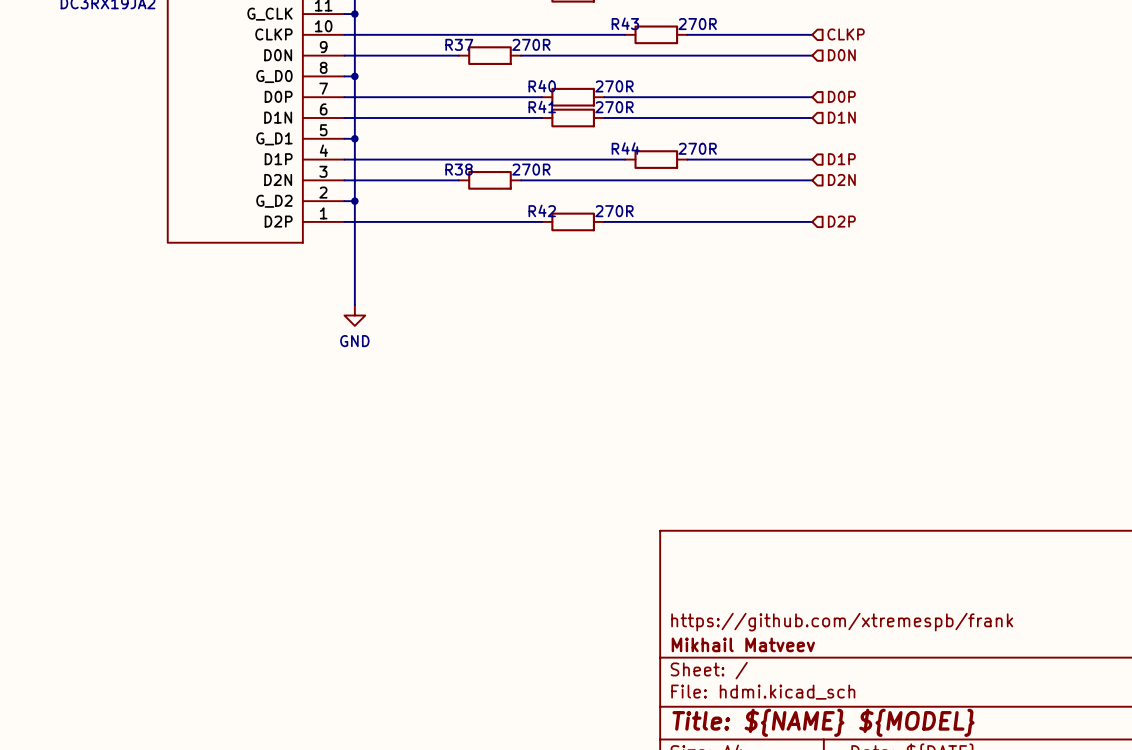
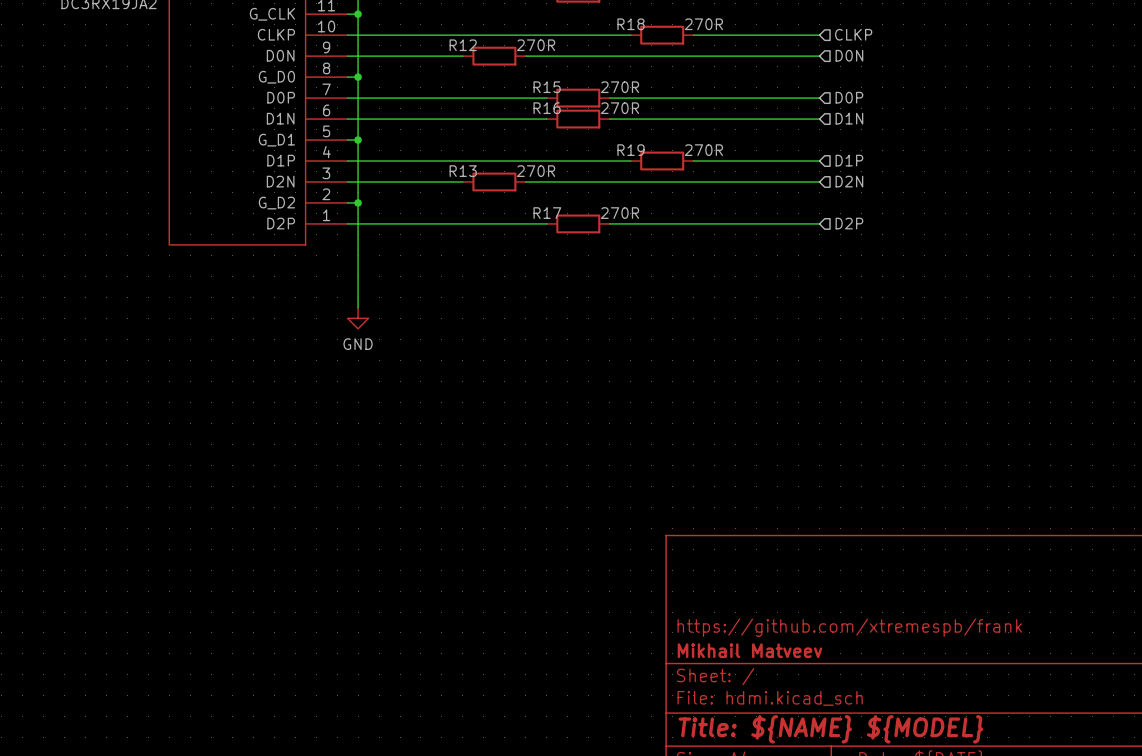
R43 name: R43 (625, 23) -> R18 (630, 24)
R37 name: R37 (459, 44) -> R12 (463, 45)
R40 name: R40 (542, 86) -> R15 (547, 87)
R41 name: R41 (542, 106) -> R16 (547, 108)
R44 name: R44 (625, 148) -> R19 (630, 150)
R38 name: R38 (459, 169) -> R13 (463, 171)
R42 name: R42 (542, 210) -> R17 (547, 213)

